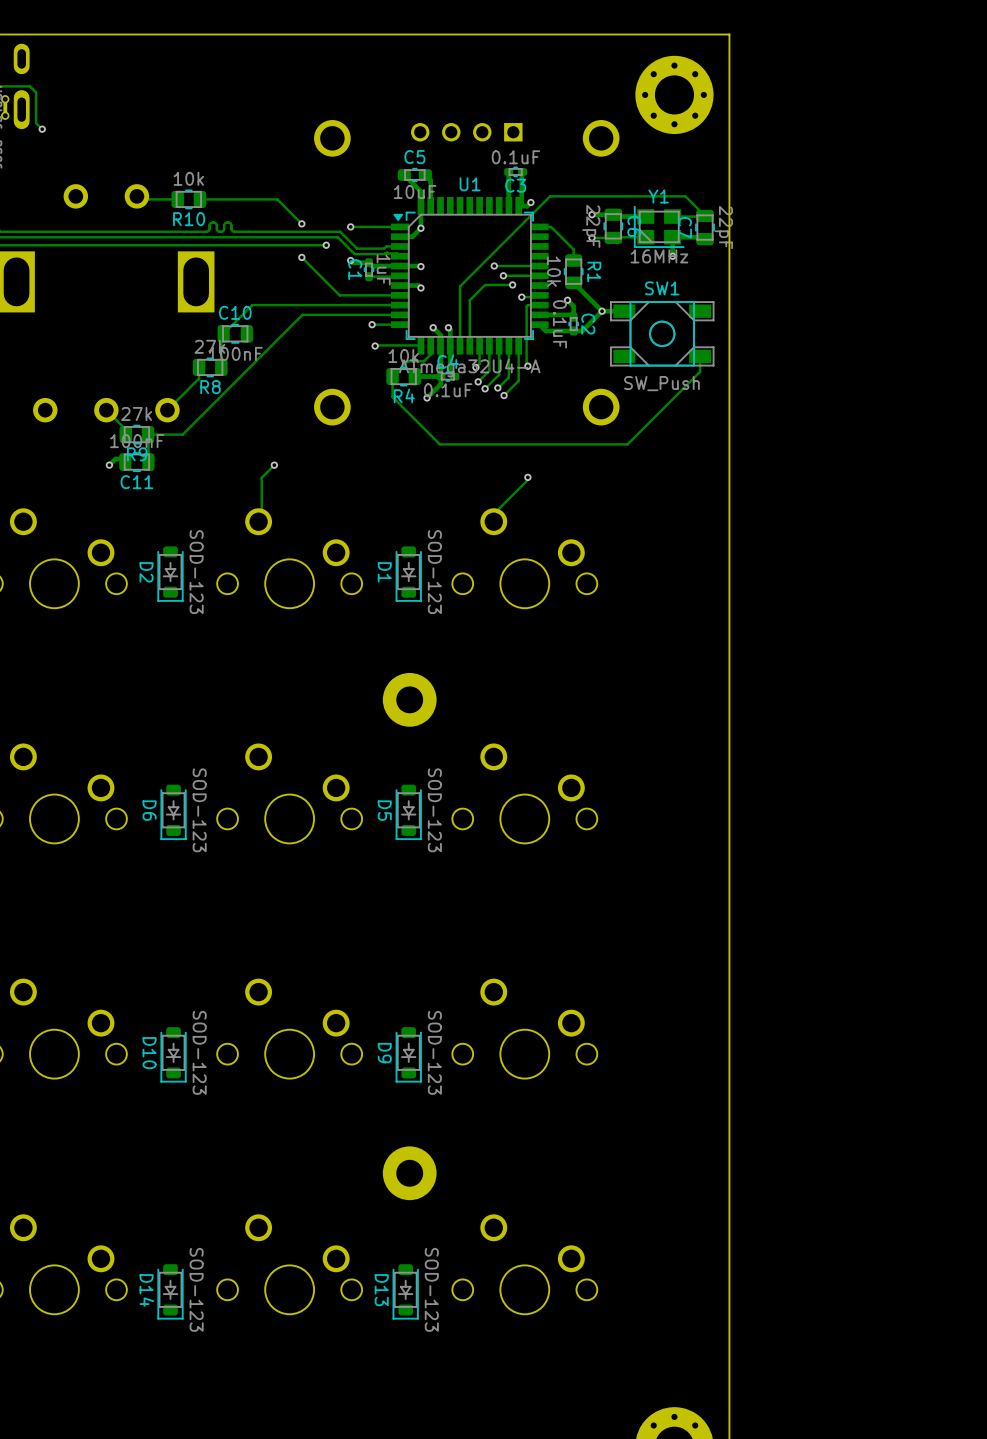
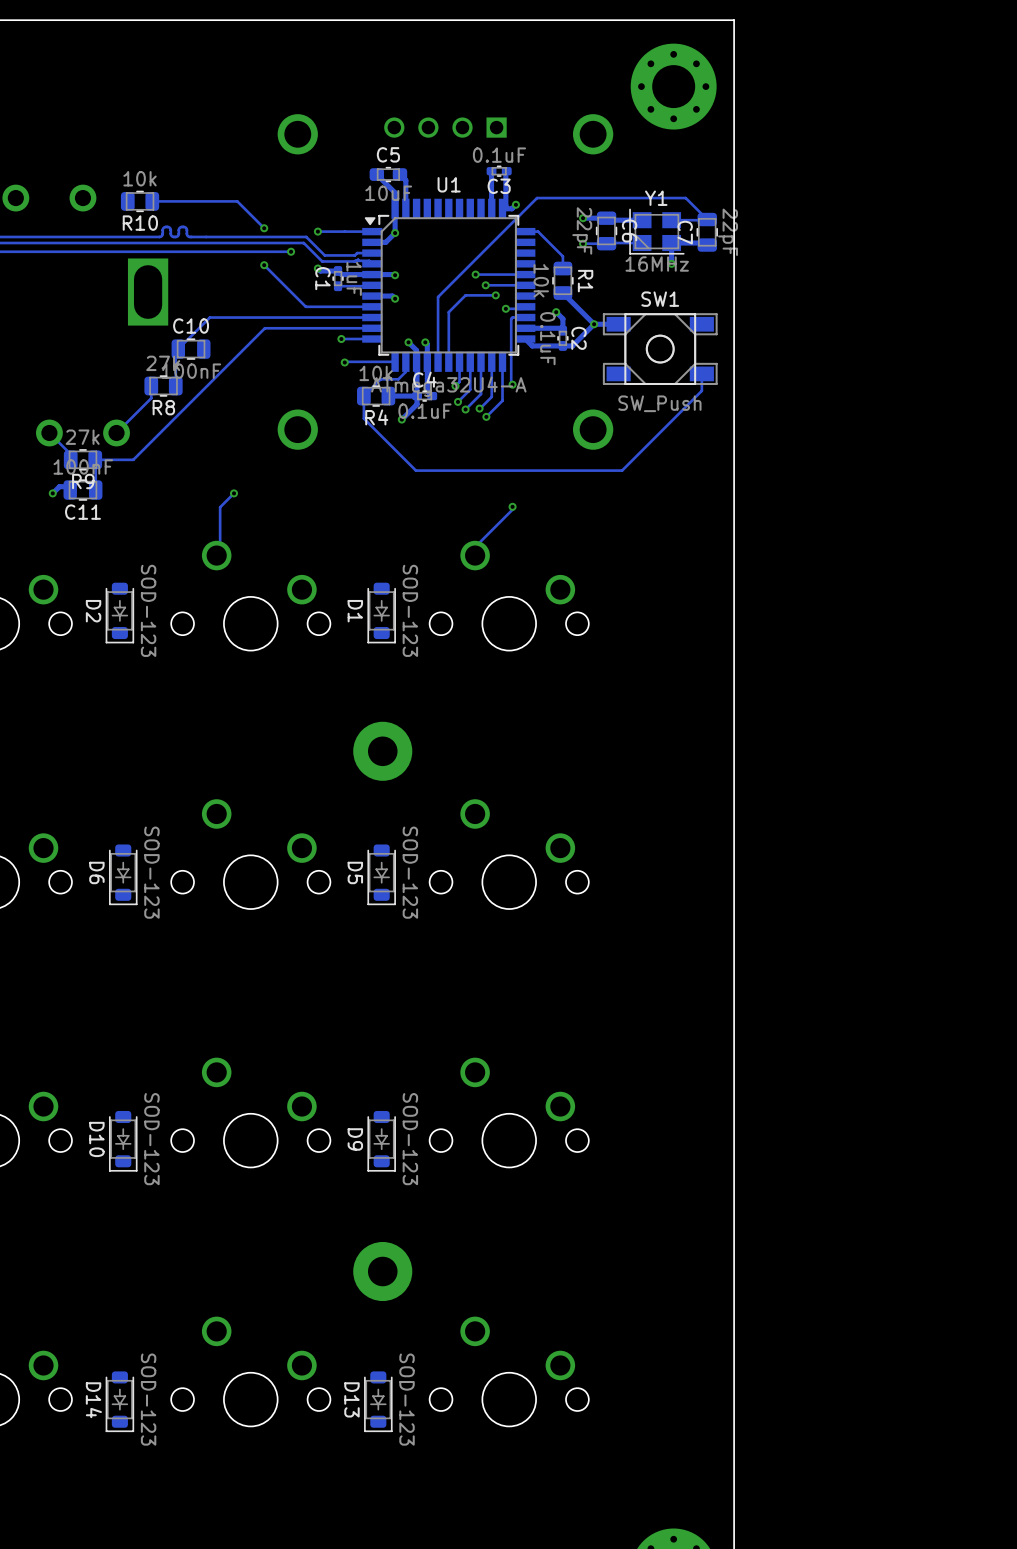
track: (136, 196) (139, 199) (177, 199) -> none

